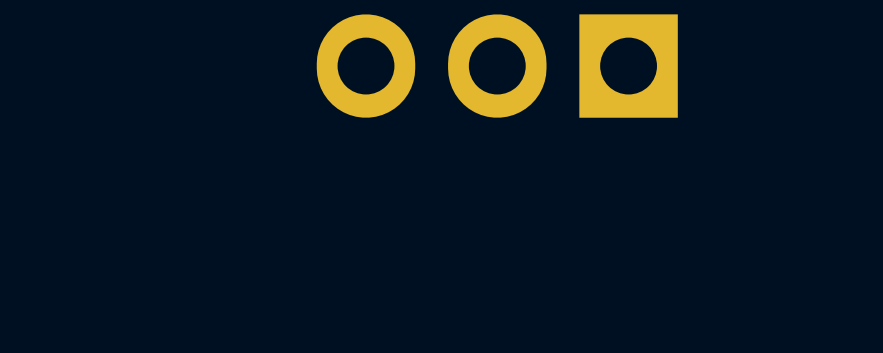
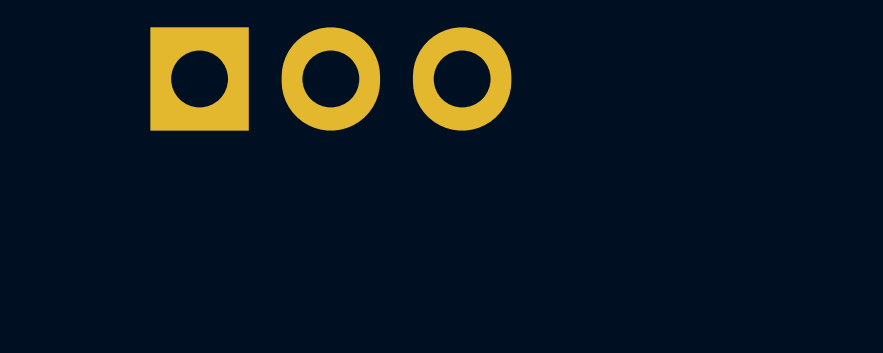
part rotation: 0° (497, 66) -> 180° (330, 78)

